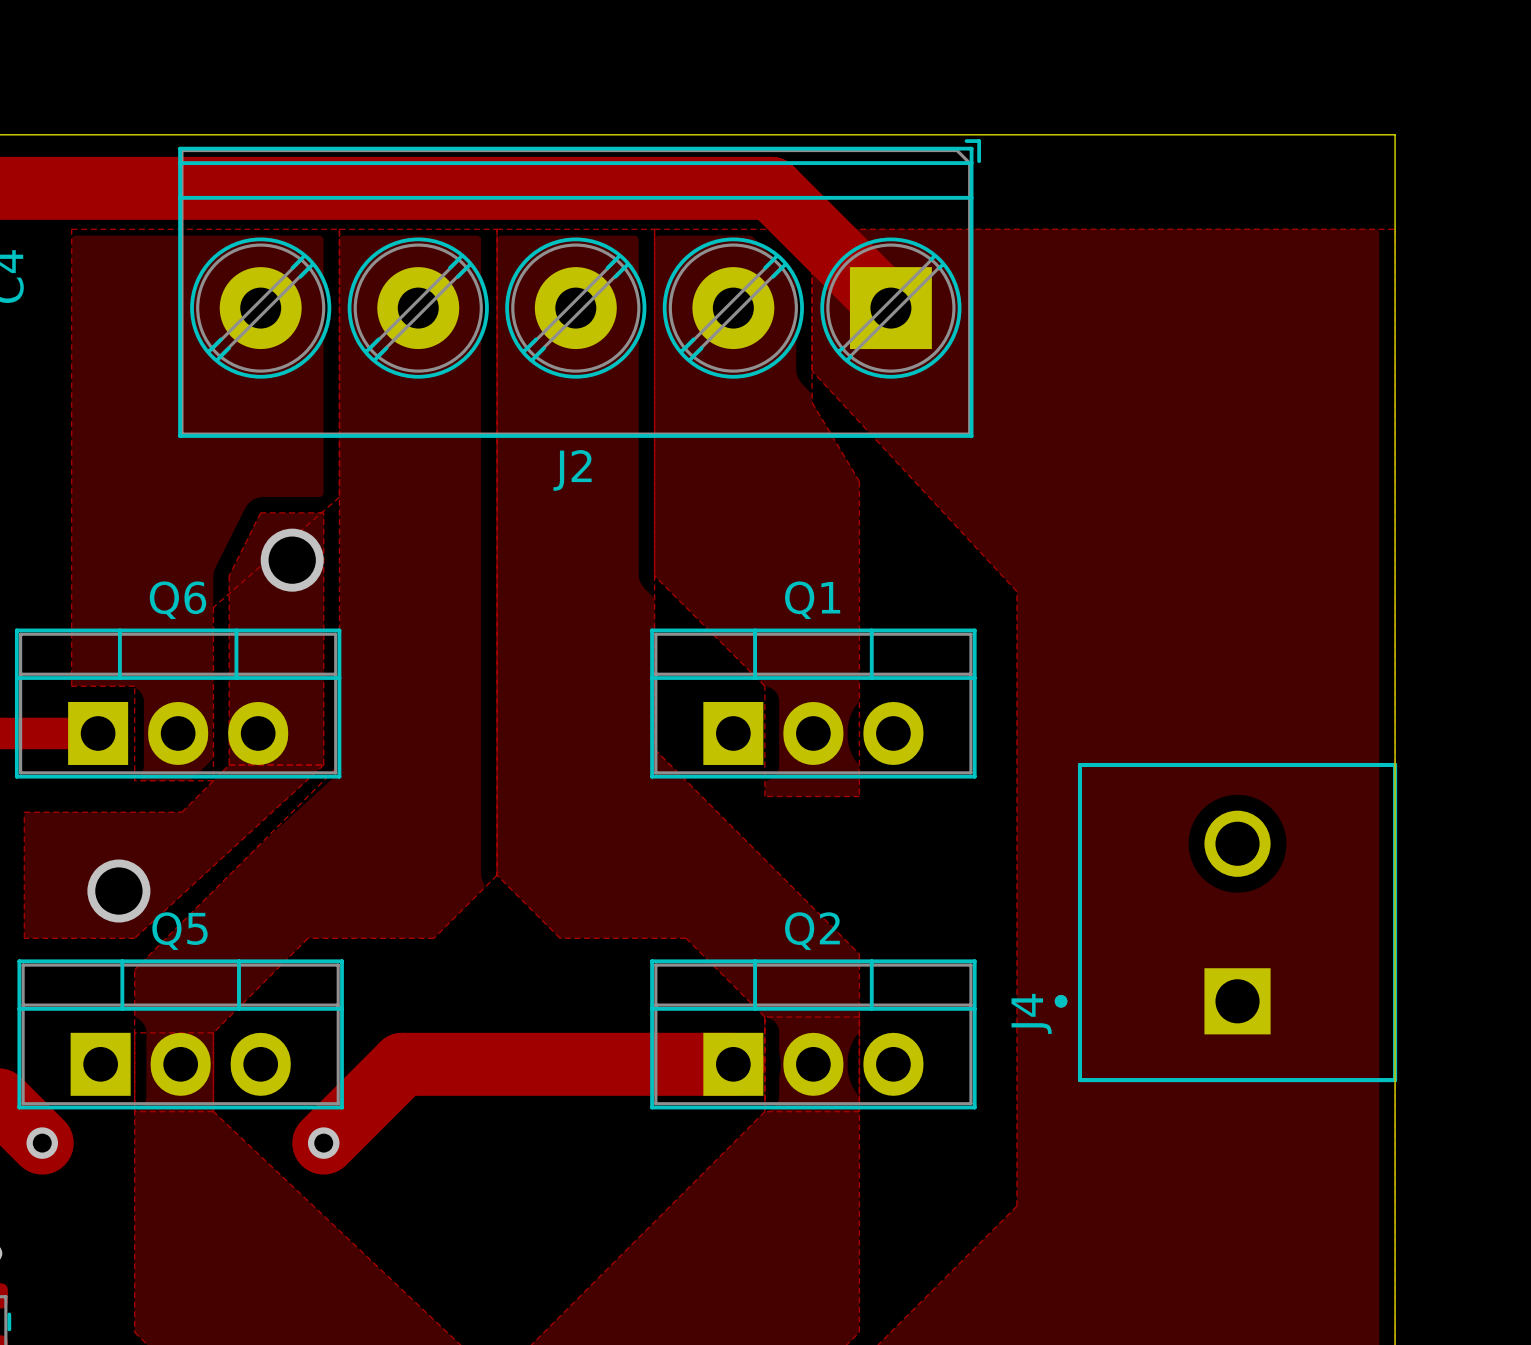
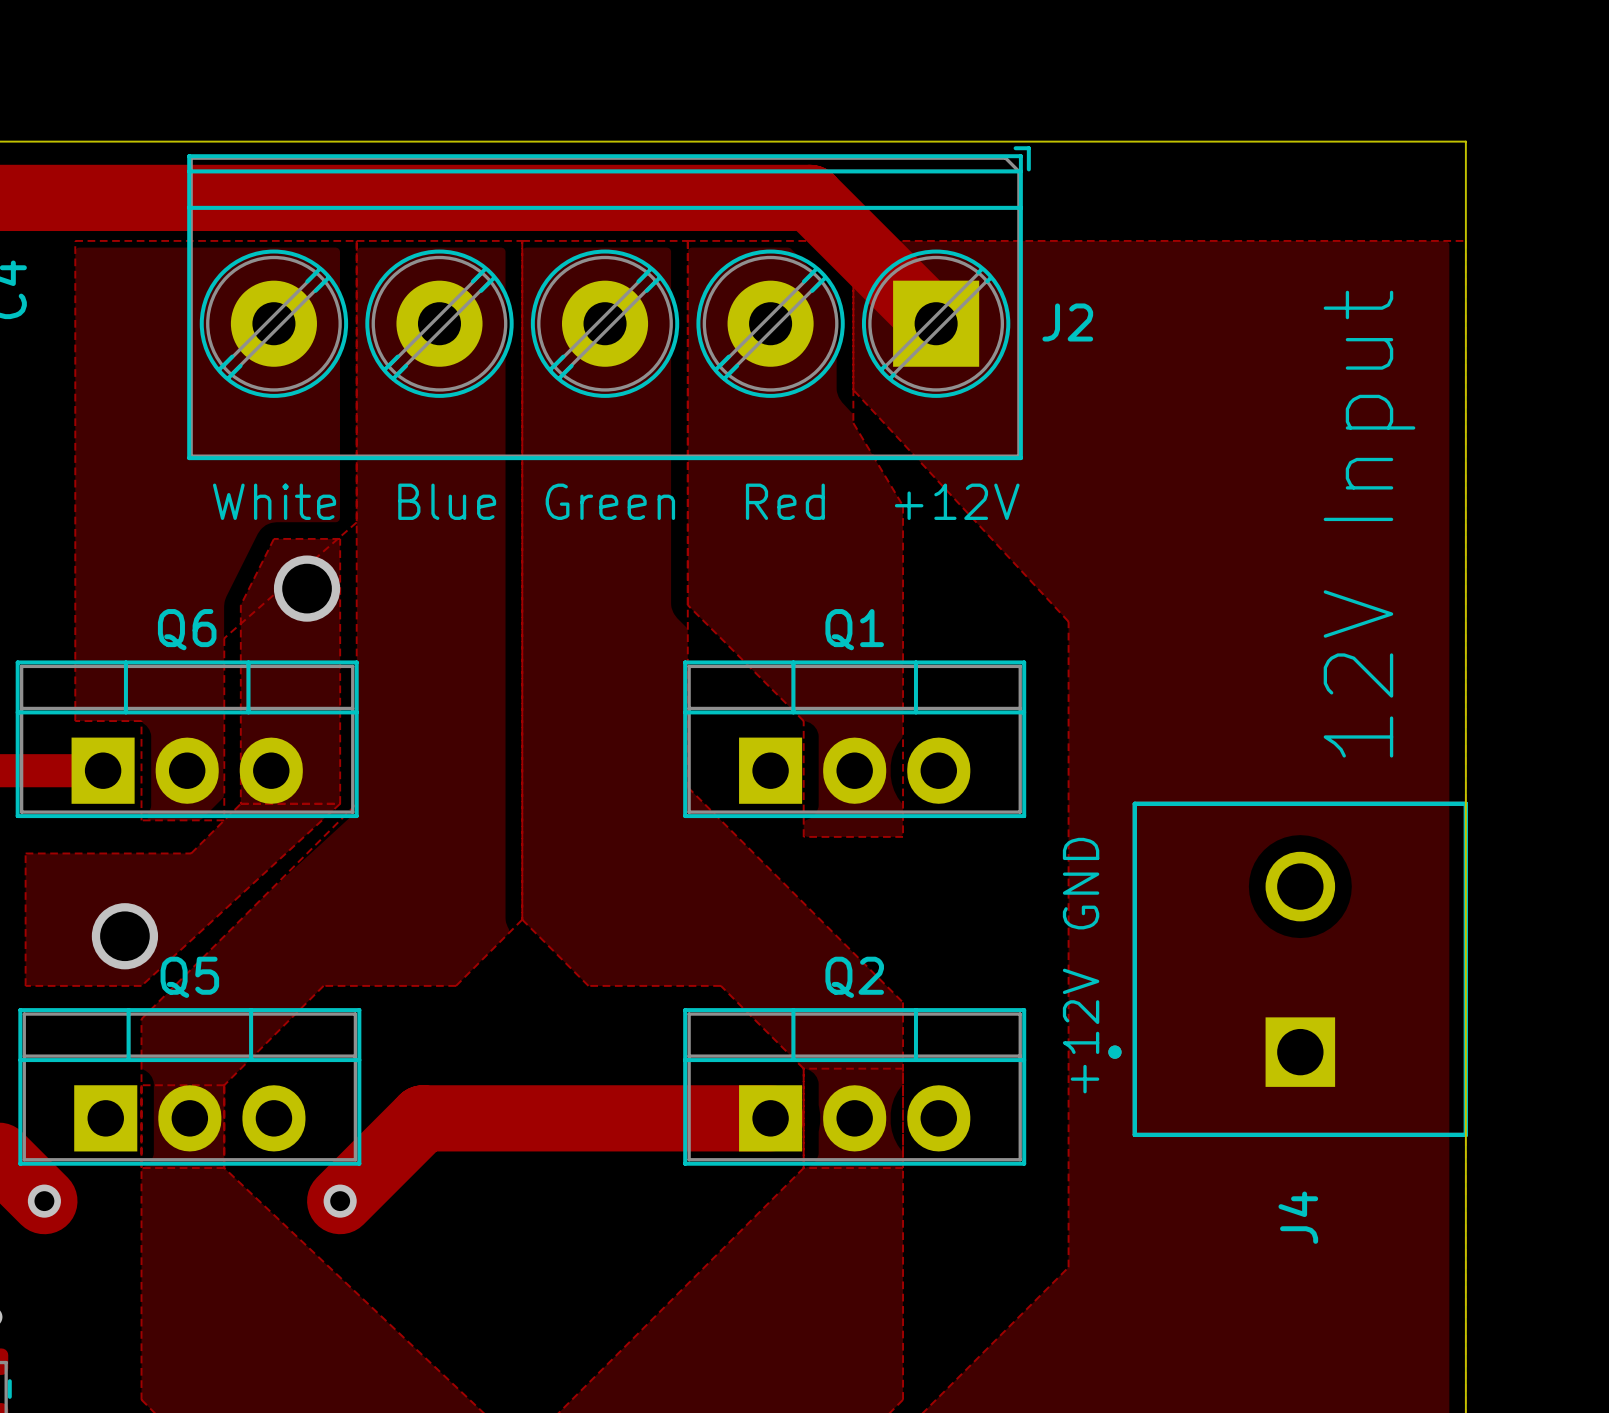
J2 name position: J2 (572, 470) -> J2 (1067, 322)
text: none -> White (274, 501)
text: none -> Blue (447, 501)
text: none -> Green (610, 501)
text: none -> Red (785, 501)
text: none -> +12V (957, 501)
text: none -> 12V Input (1369, 524)
text: none -> GND (1081, 883)
text: none -> +12V (1081, 1031)
J4 name position: J4 (1031, 1013) -> J4 (1298, 1217)

